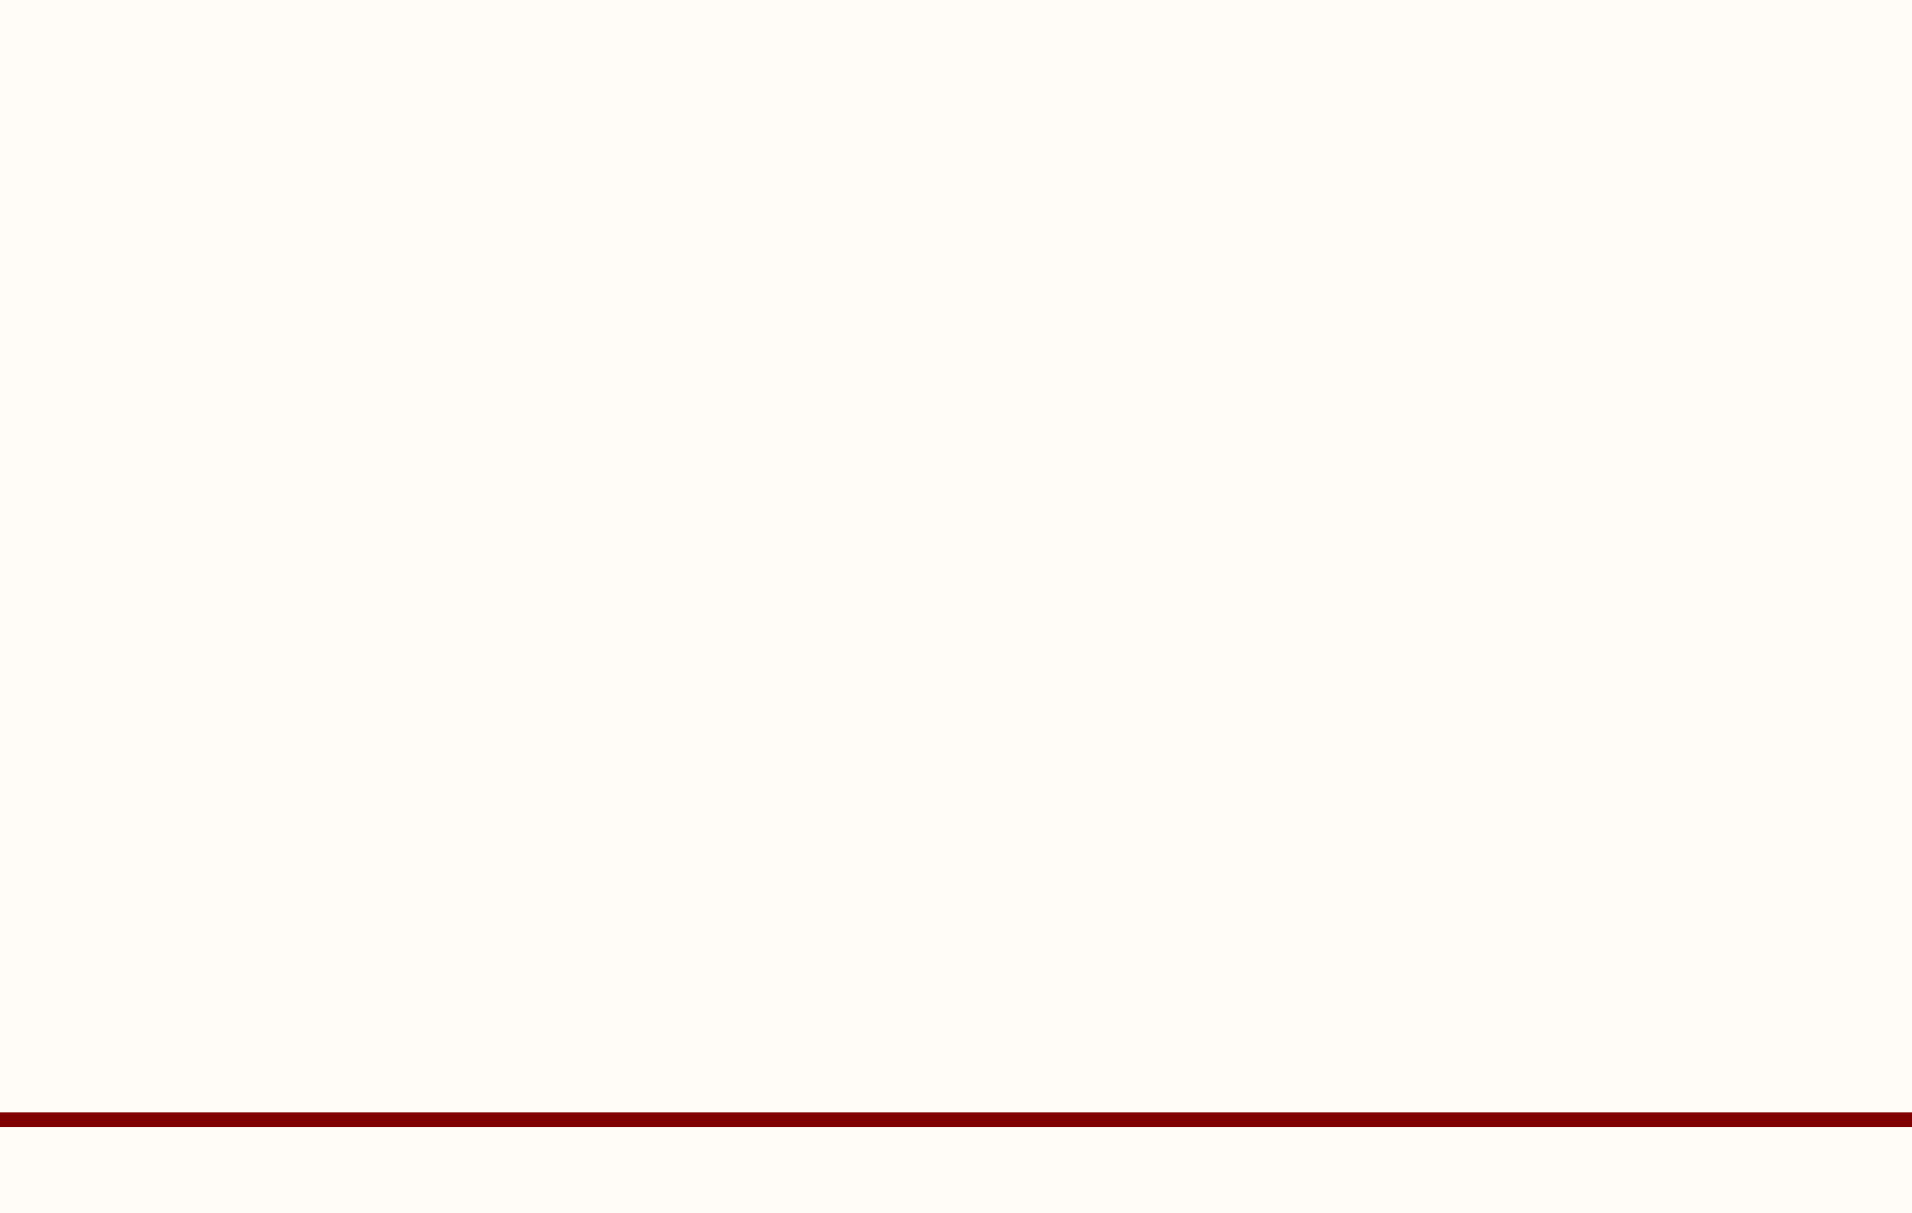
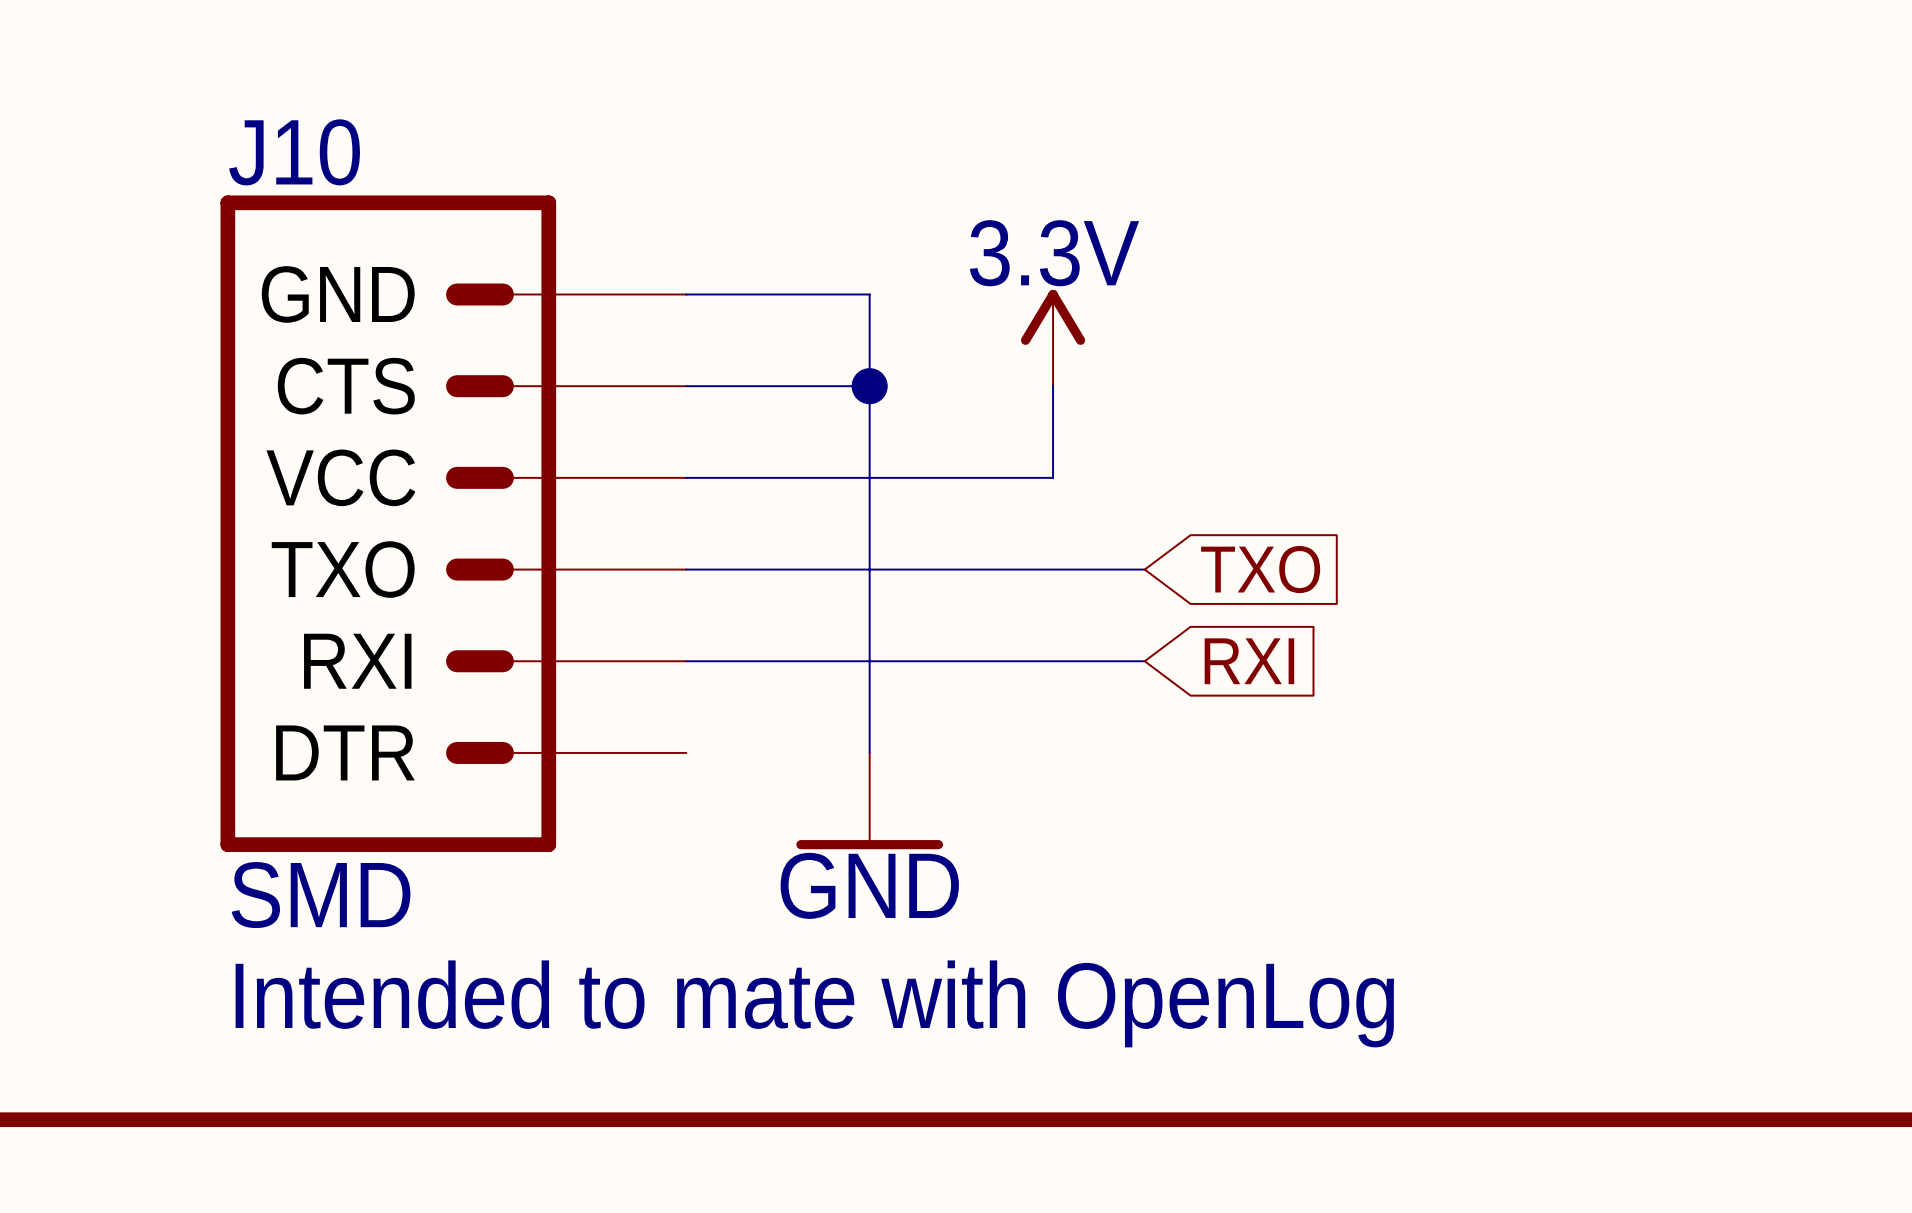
wire: none -> (686, 294) (869, 294) (869, 752)
power symbol: none -> 3.3V (1053, 338)
wire: none -> (686, 386) (869, 386)
junction: none -> (869, 386)
wire: none -> (1053, 386) (1053, 477) (686, 477)
J10: none -> SMD (453, 523)
wire: none -> (686, 569) (1144, 569)
global label: none -> TXO (1260, 569)
wire: none -> (686, 661) (1144, 661)
global label: none -> RXI (1249, 661)
power symbol: none -> GND (869, 801)
text: none -> Intended to mate with OpenLog (814, 1003)

